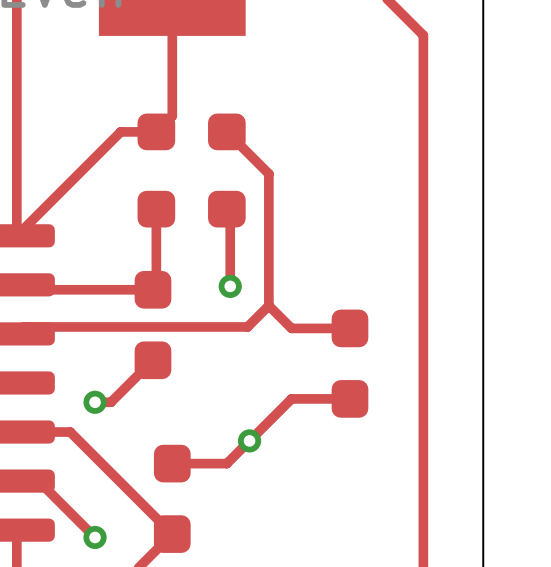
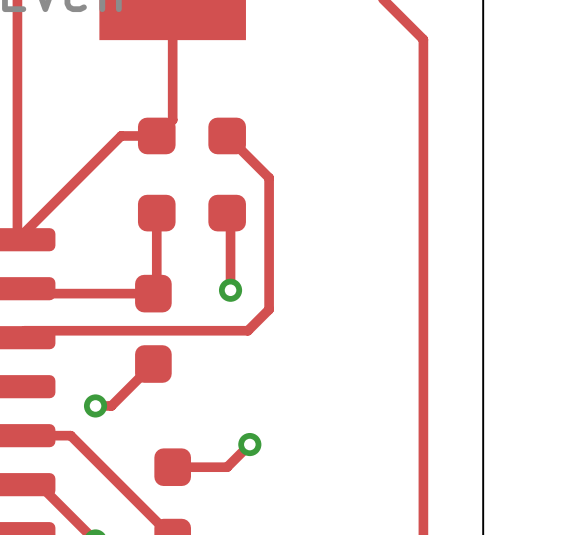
top track: (268, 305) (291, 328) (349, 328) -> none
part: (349, 363) -> none
top track: (349, 398) (291, 398) (249, 440) -> none

